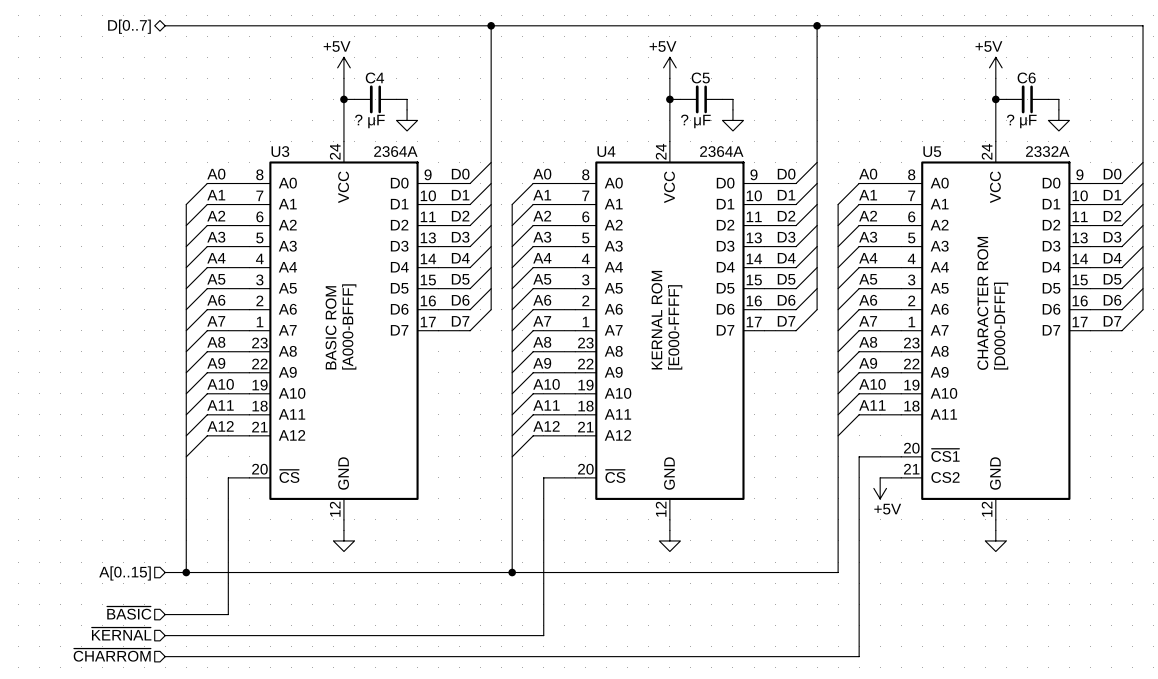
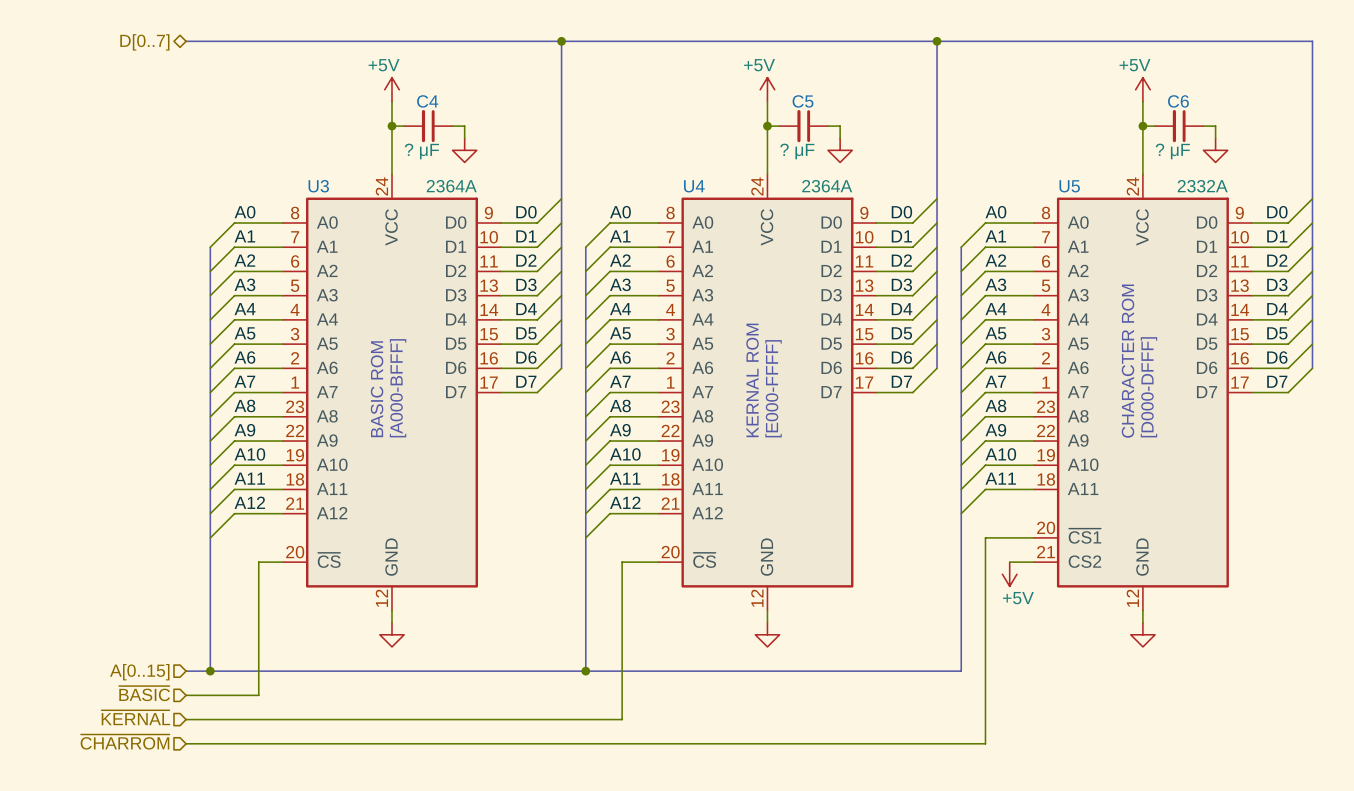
hierarchical label: none -> ~{BASIC} (144, 693)
wire: (228, 593) (228, 614) -> (258, 695) (186, 695)
hierarchical label: ~{BASIC} (129, 613) -> ~{KERNAL} (135, 717)
wire: (543, 614) (543, 635) -> (622, 719) (258, 719)
hierarchical label: ~{KERNAL} (121, 634) -> ~{CHARROM} (125, 742)
wire: (859, 635) (859, 656) (165, 656) -> (985, 743) (622, 743)
hierarchical label: ~{CHARROM} (112, 655) -> none

